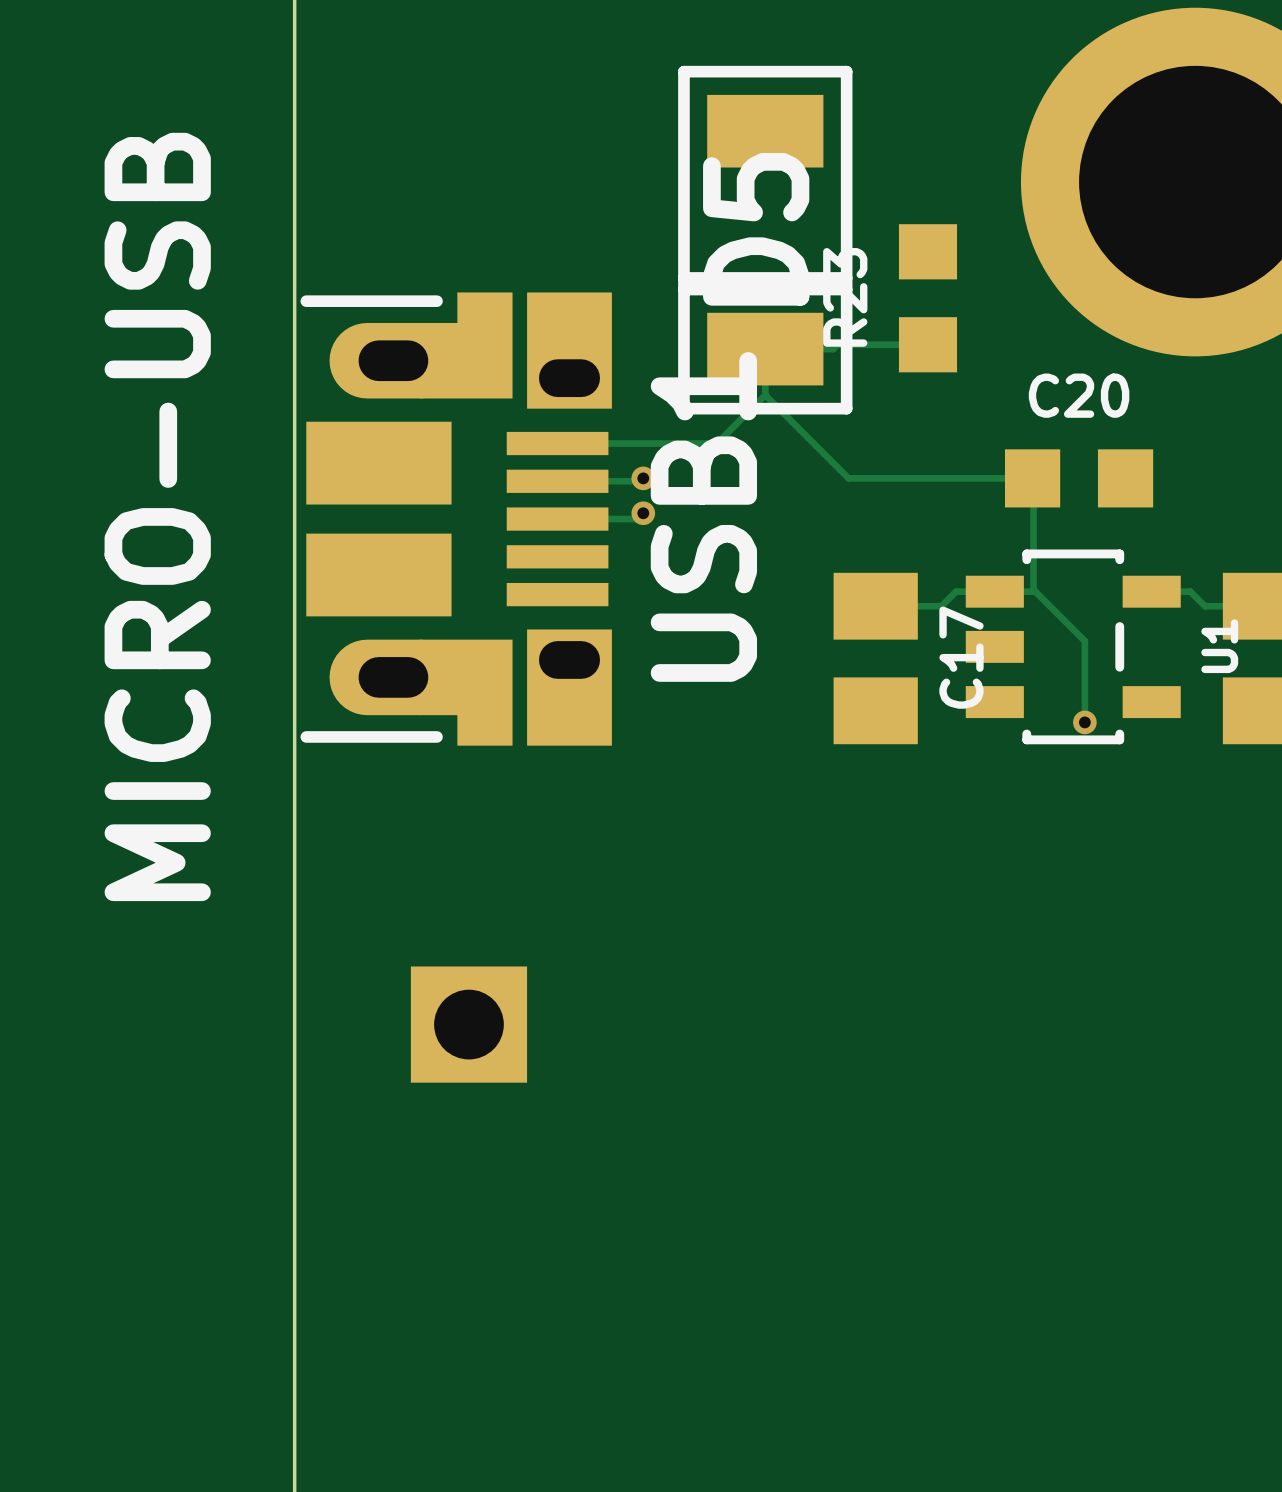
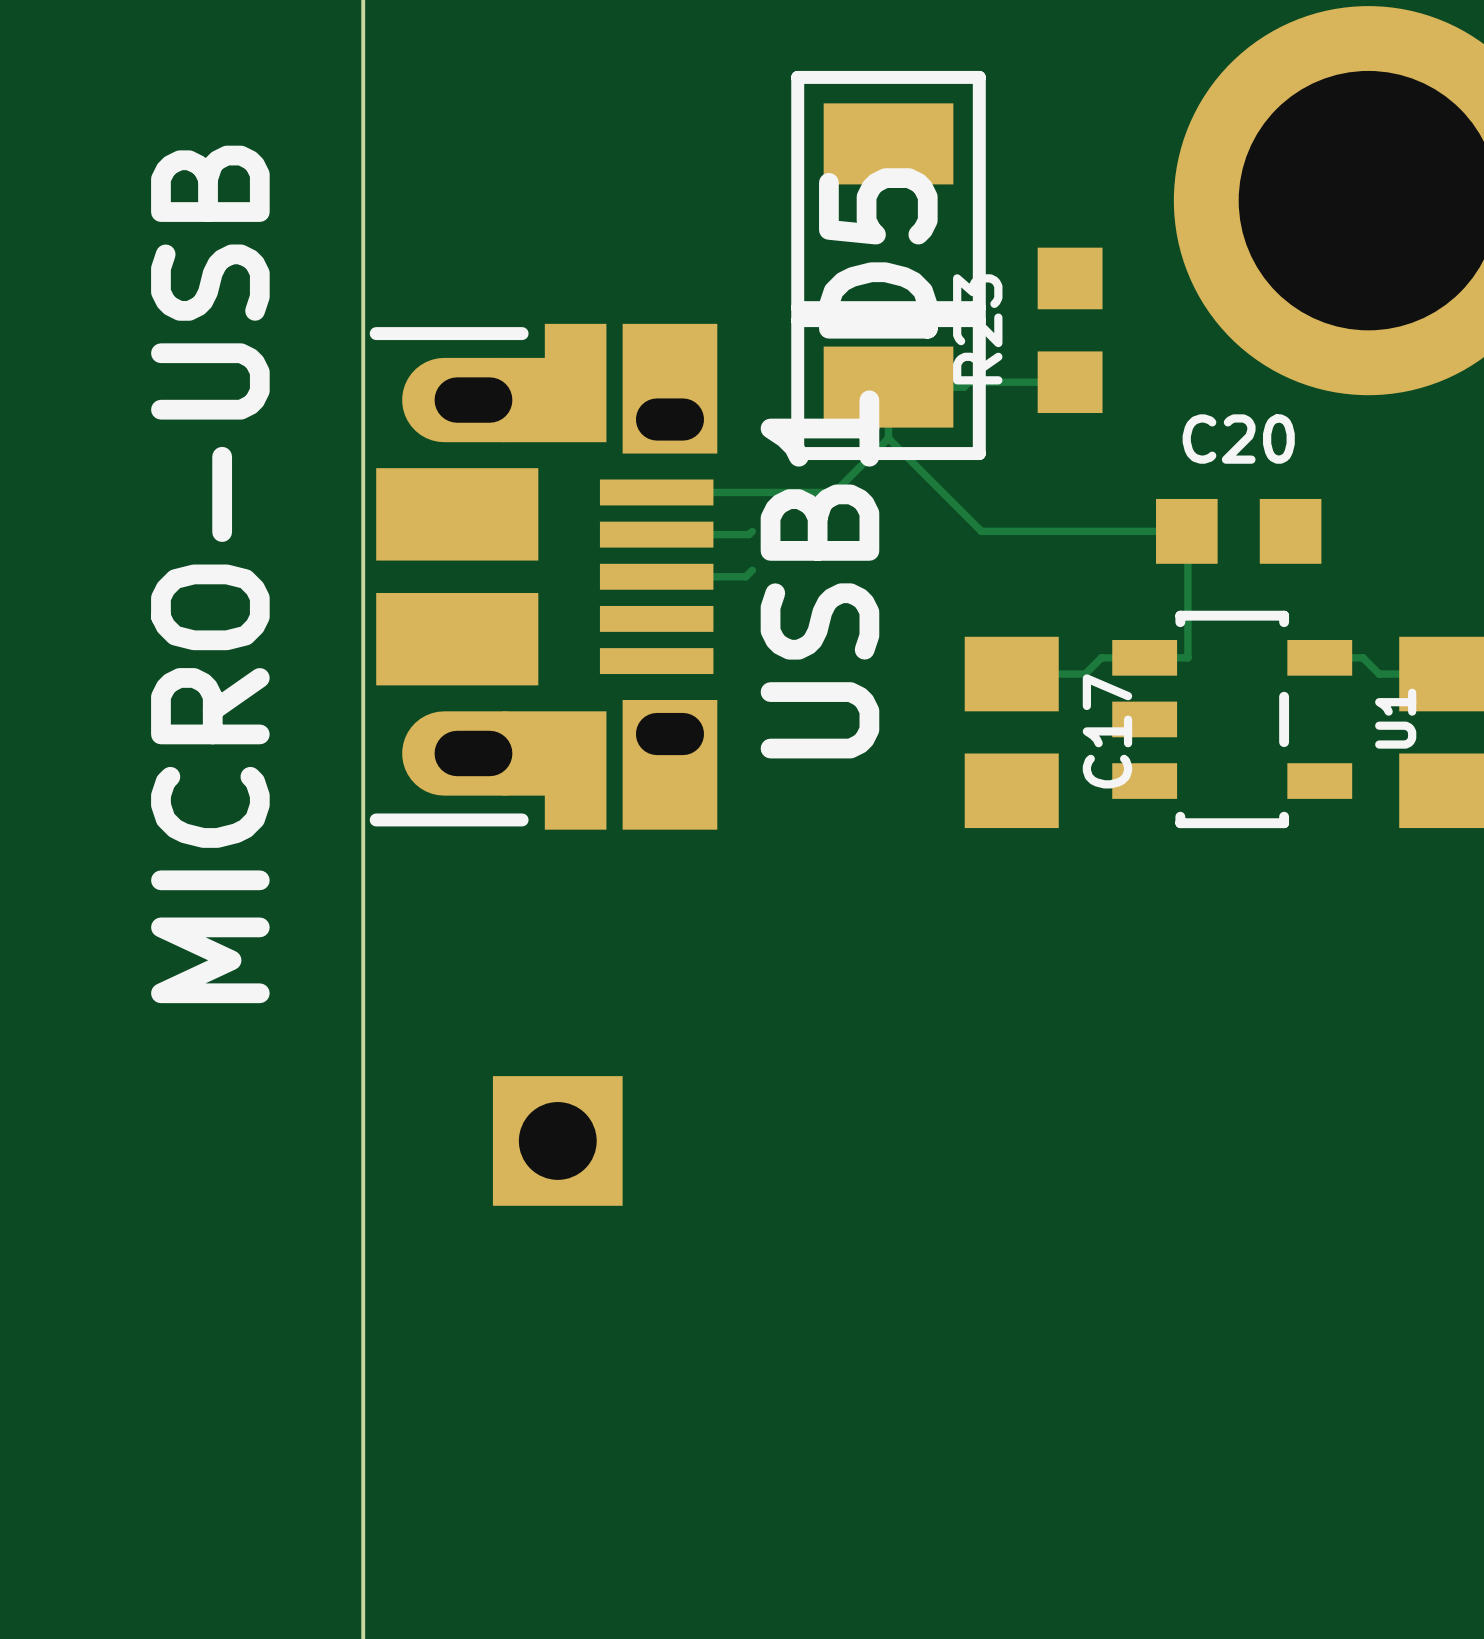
via: (643, 478) -> none
via: (643, 513) -> none
track: (1033, 591) (1084, 641) (1084, 722) -> none
via: (1084, 722) -> none

